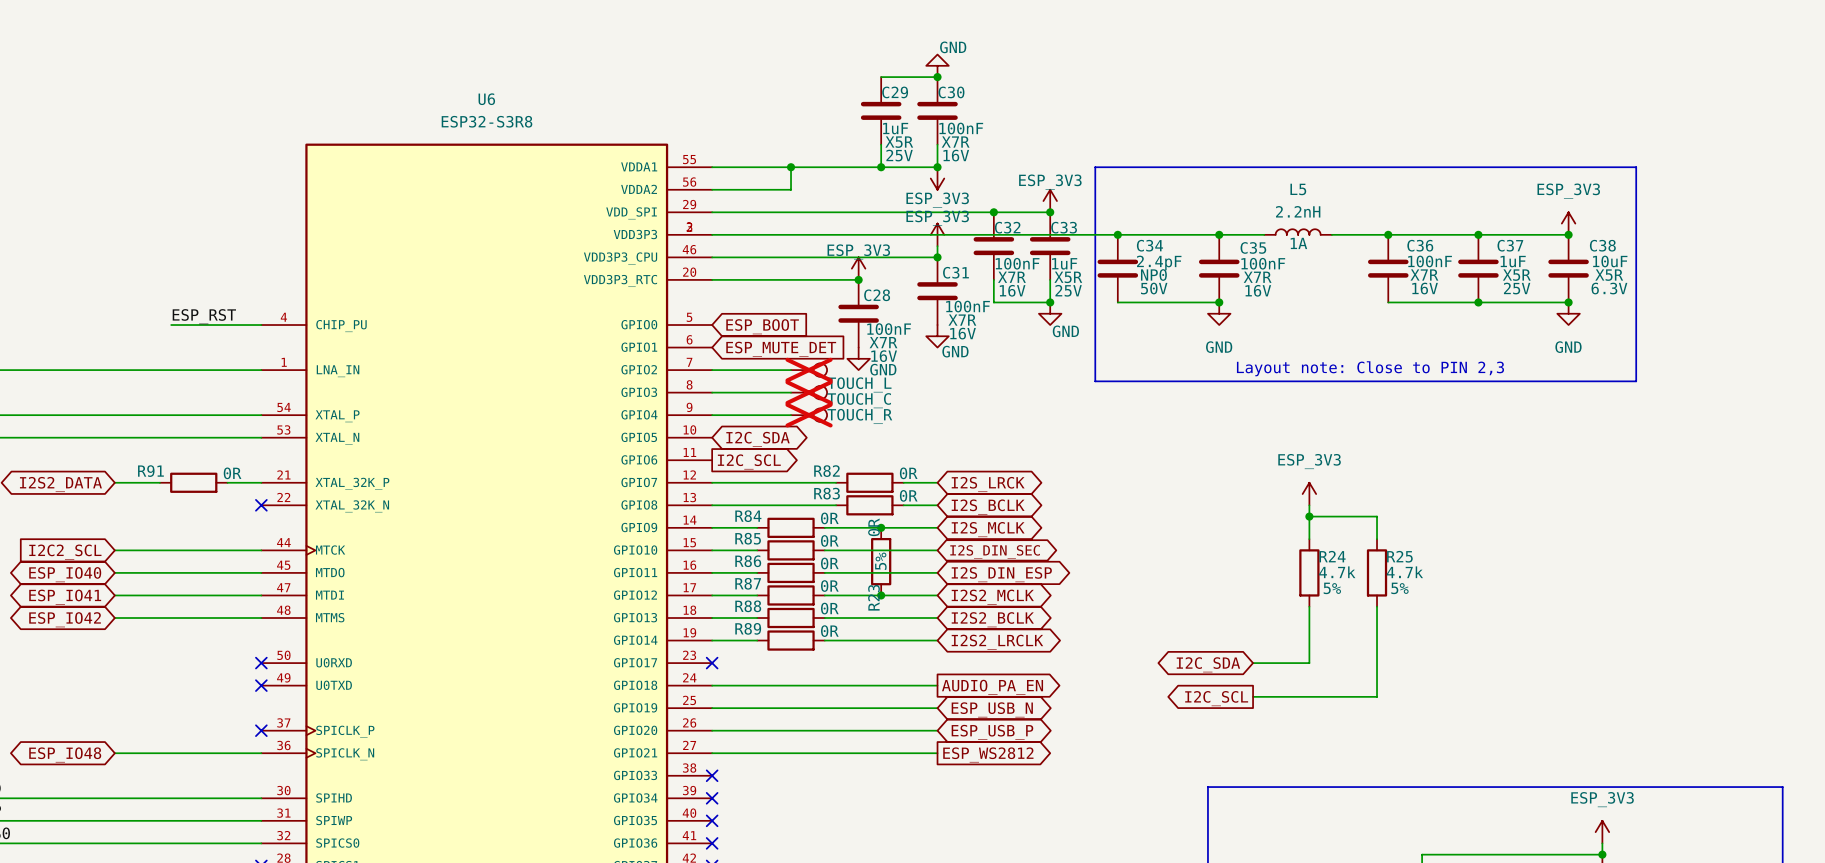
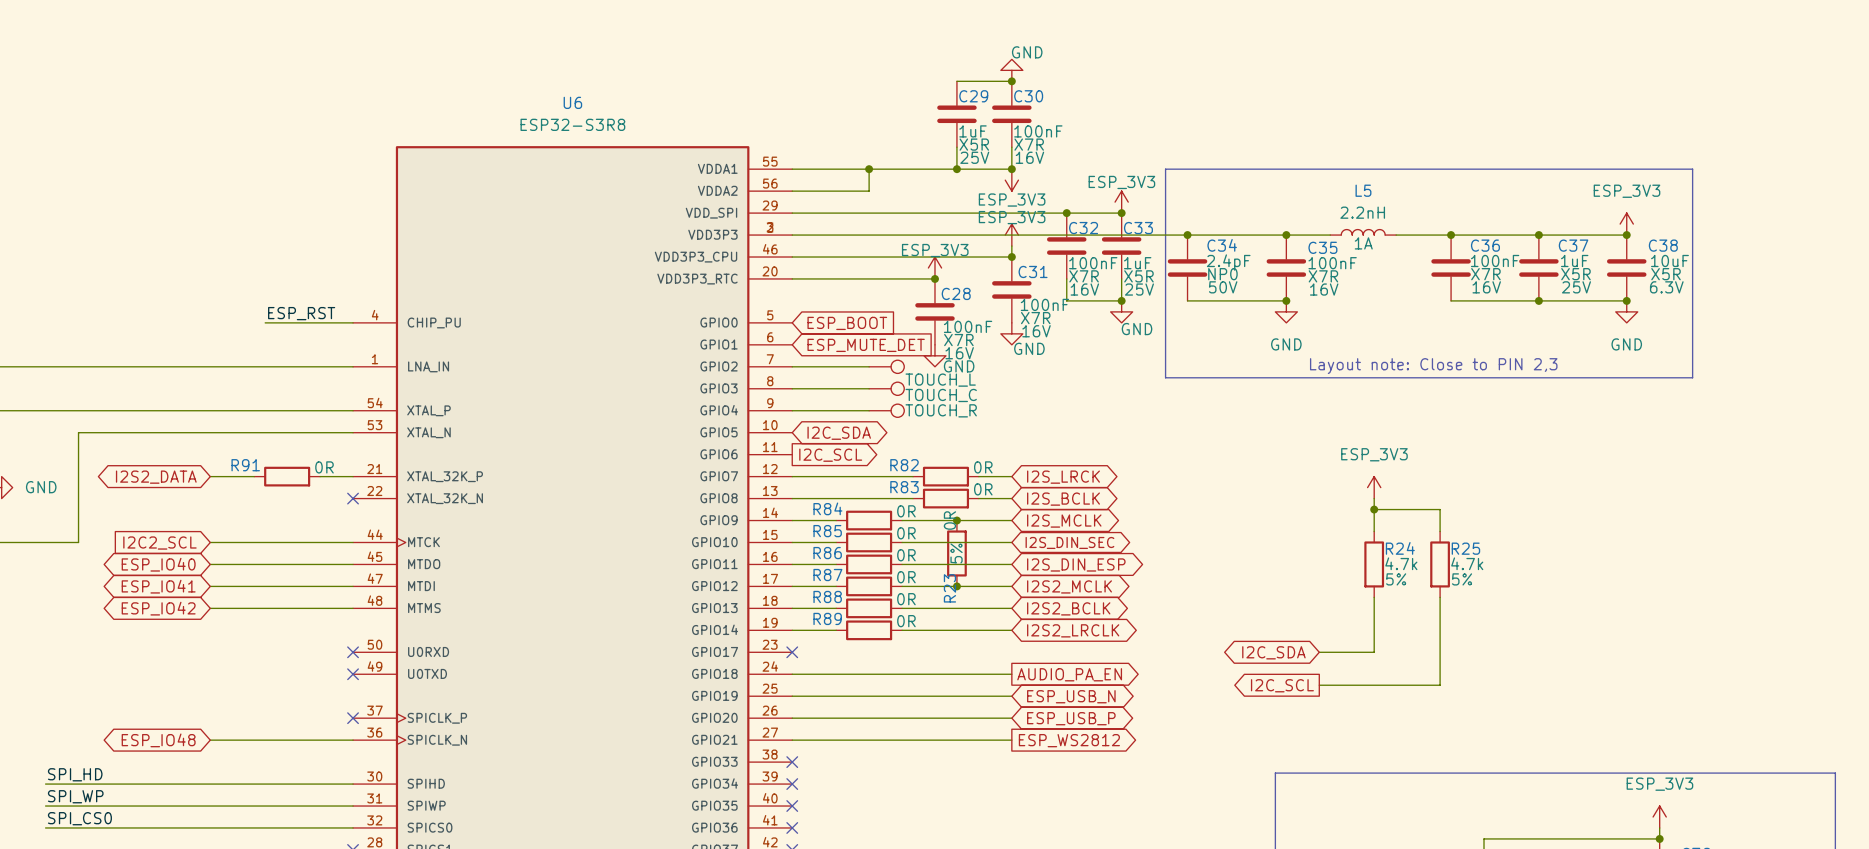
part do-not-place cross: (809, 370) -> none
part do-not-place cross: (809, 392) -> none
part do-not-place cross: (809, 415) -> none

